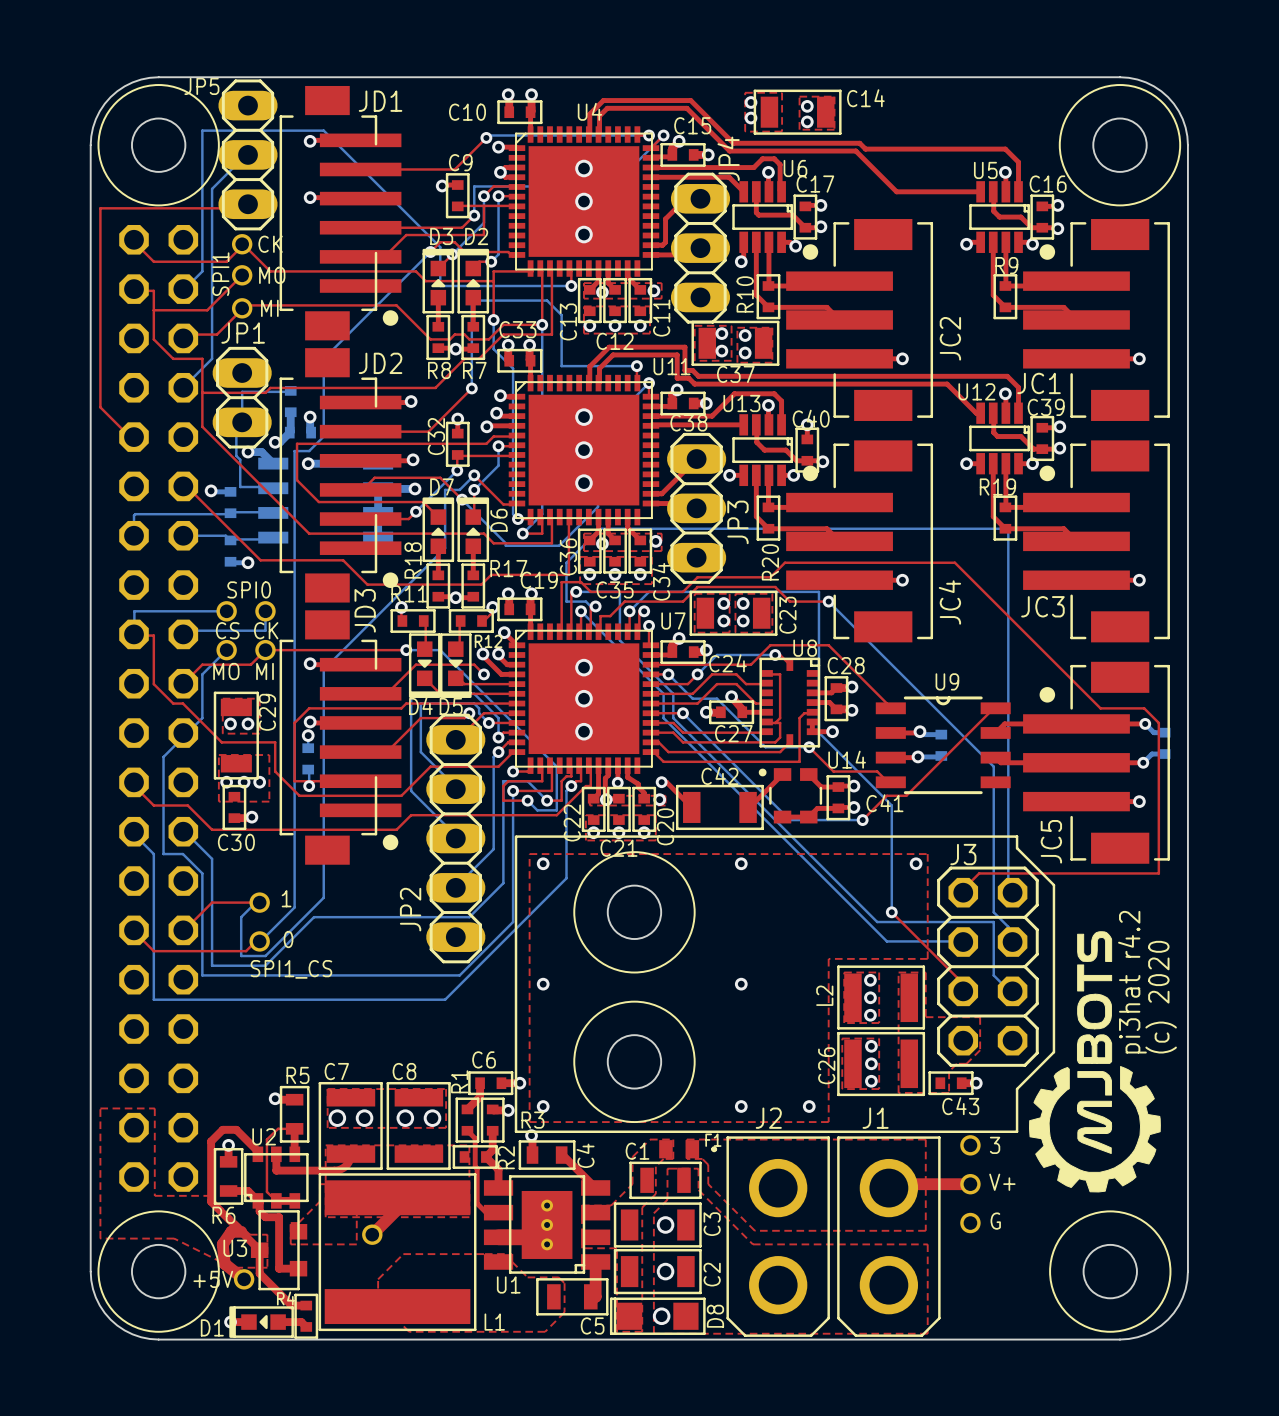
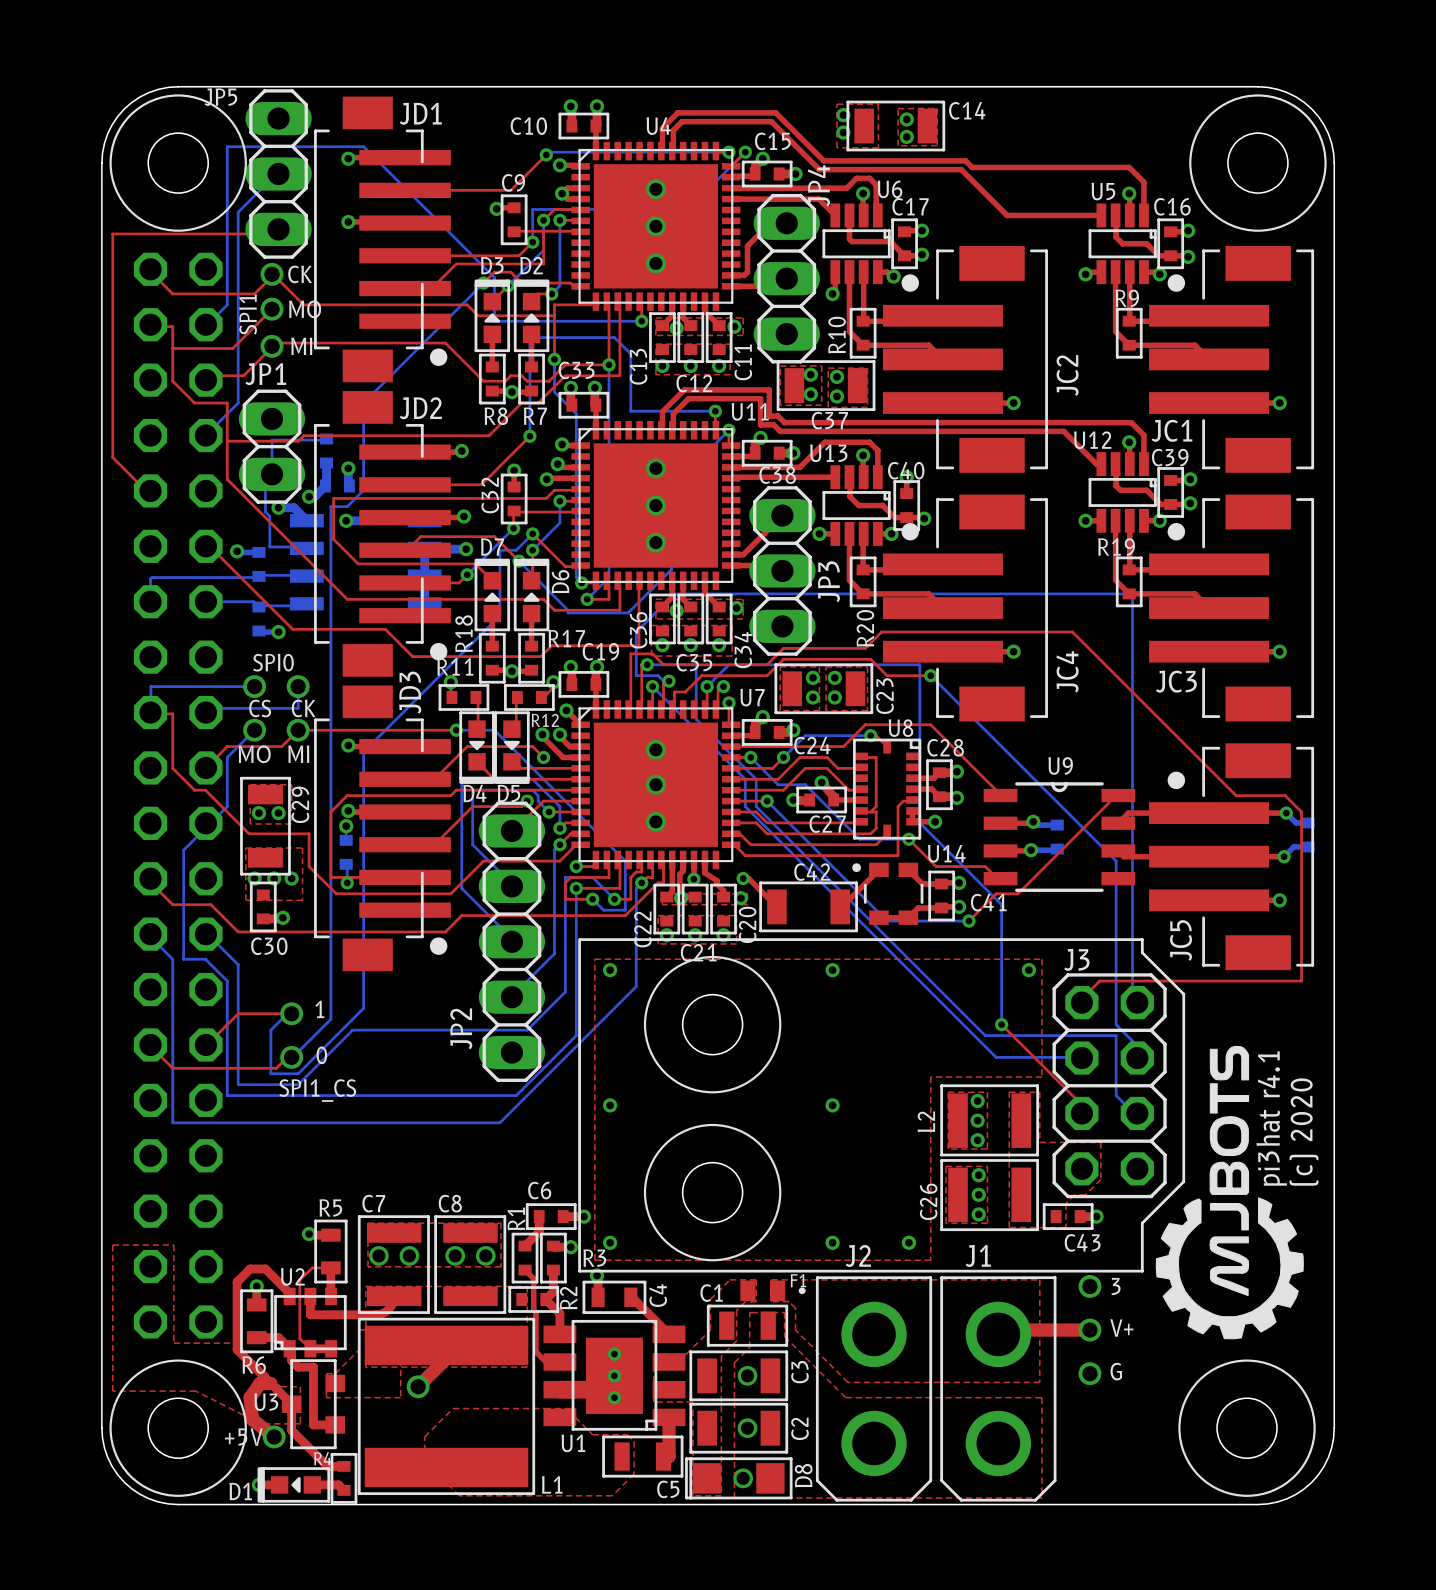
text: pi3hat r4.2 (1132, 982) -> pi3hat r4.1 (1271, 1118)

